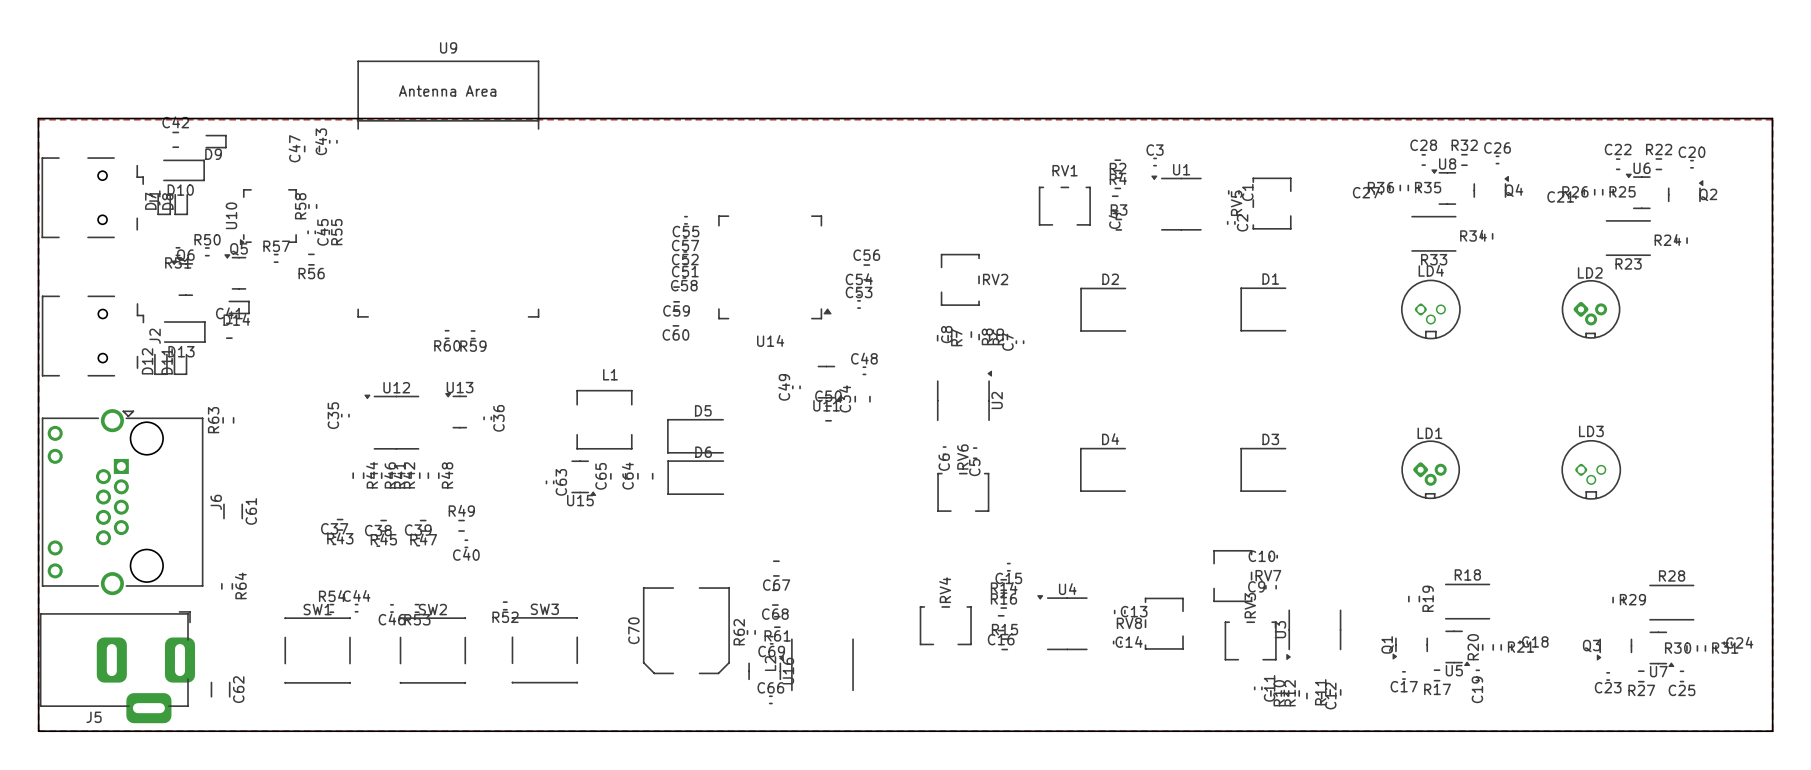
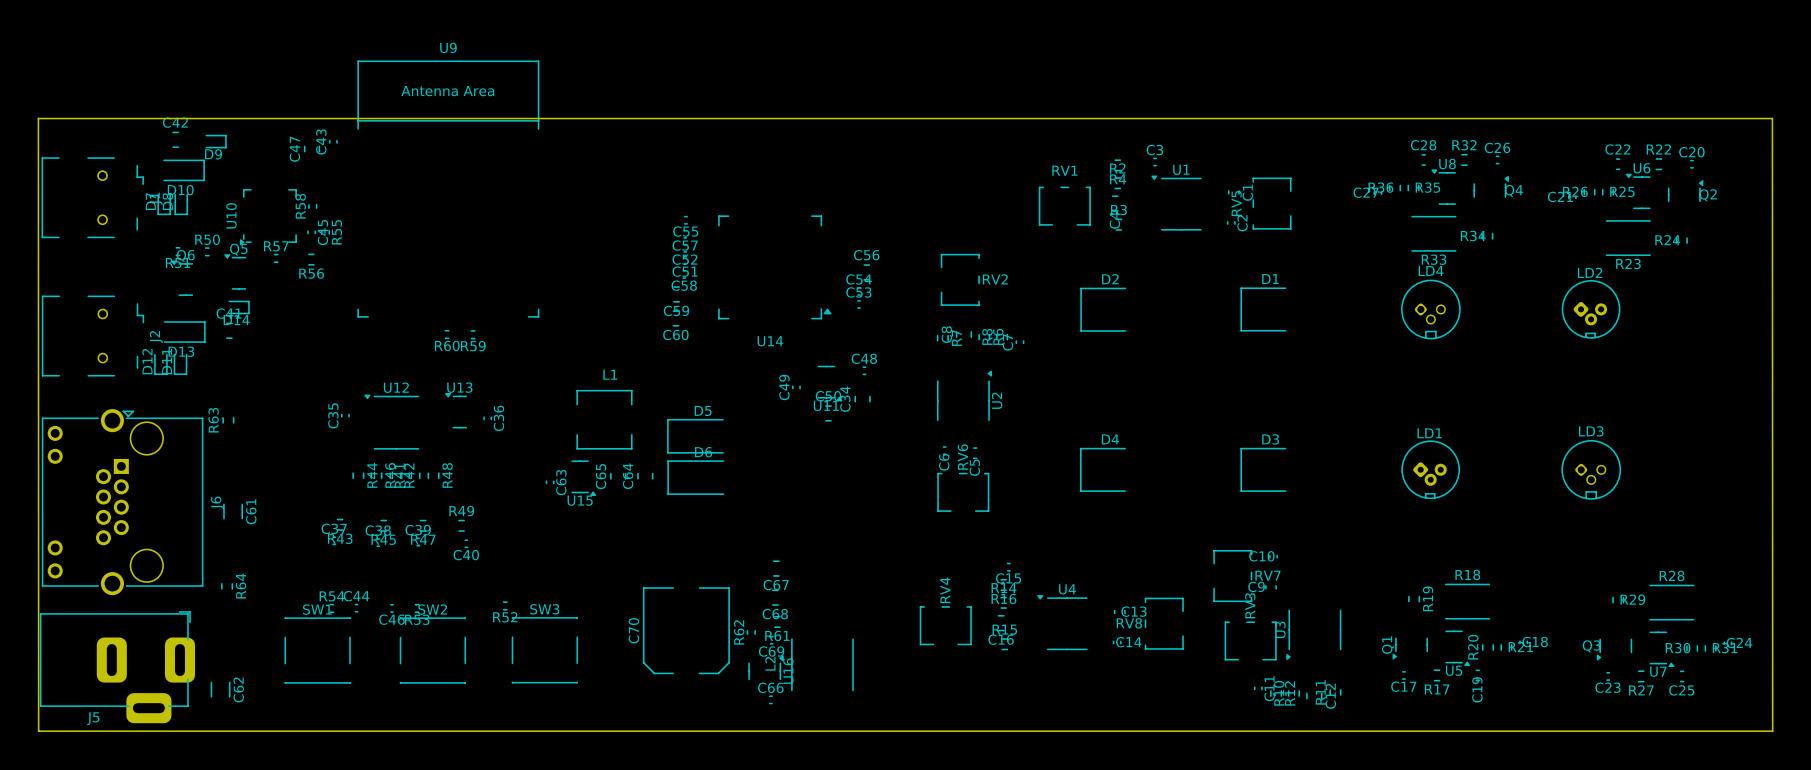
zone outline: (38, 119) (1772, 119) (1772, 731) (38, 731) (38, 119) -> none

